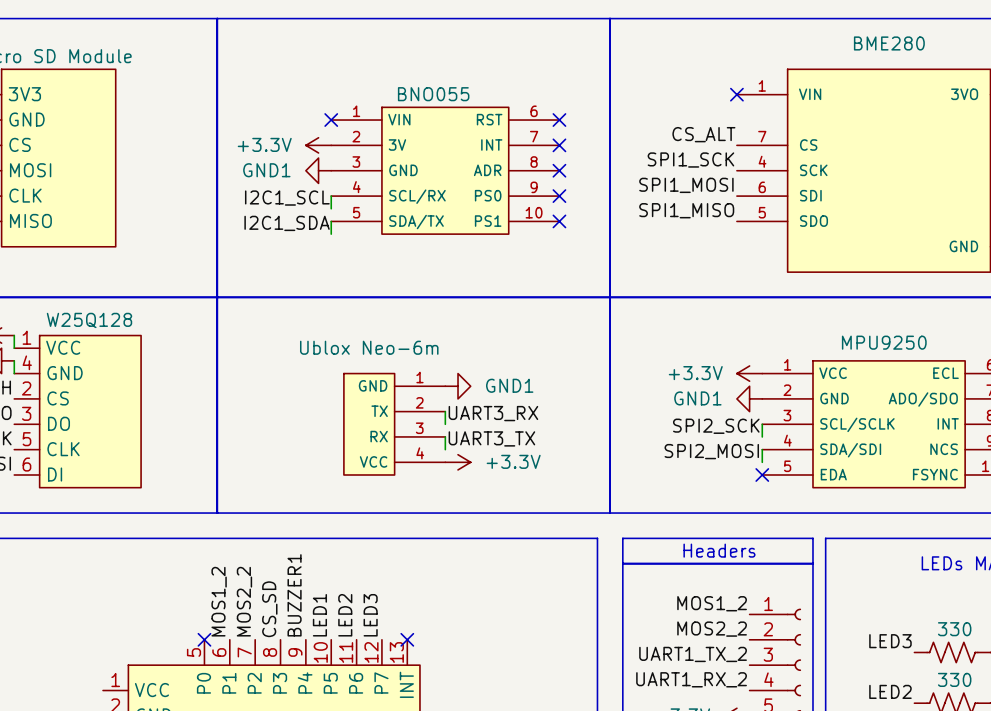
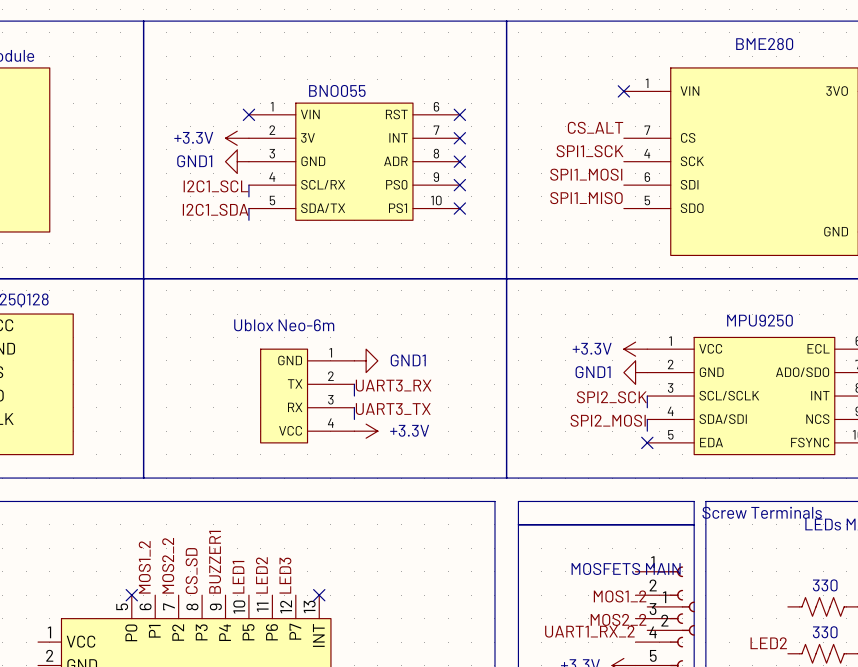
text: Headers (719, 550) -> none
text: none -> Screw Terminals (762, 512)
label position: MOS1_2 (712, 603) -> MOS1_2 (620, 596)
label position: MOS2_2 (712, 629) -> MOS2_2 (618, 619)
label: LED3 (890, 641) -> none
label: UART1_TX_2 (693, 654) -> none
part: none -> MOSFETS MAIN (671, 618)

